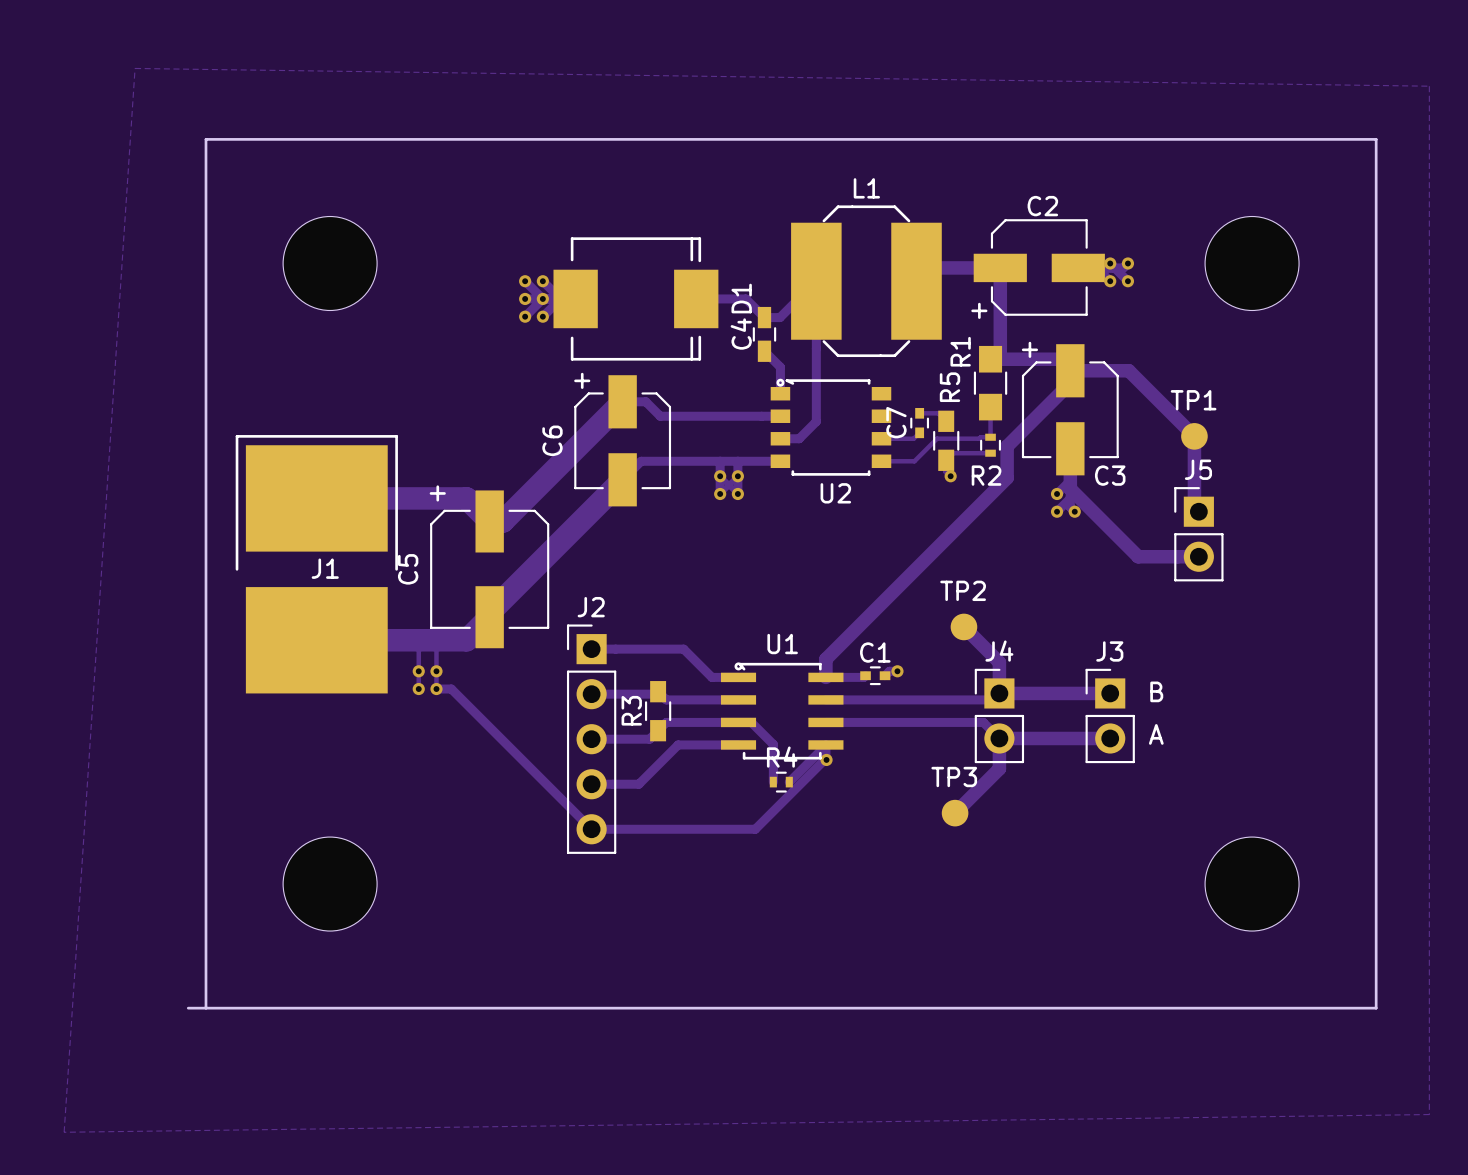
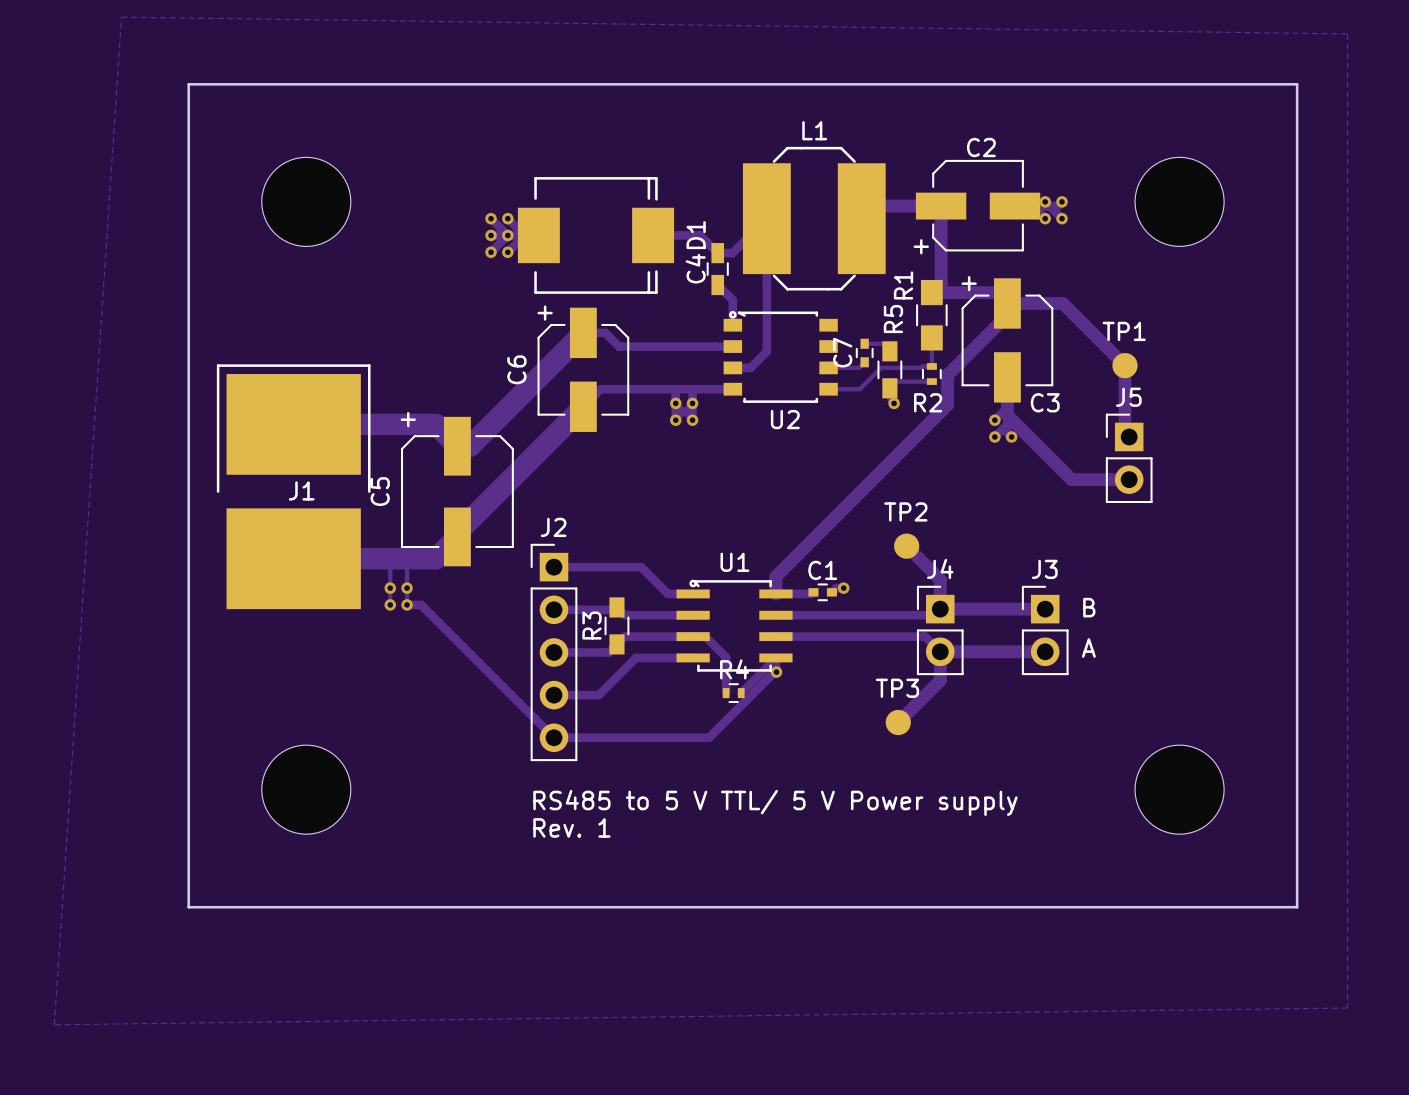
text: none -> RS485 to 5 V TTL/ 5 V Power supply (775, 802)
text: none -> Rev. 1 (571, 827)
board edge: (188, 1008) (205, 1008) -> none

